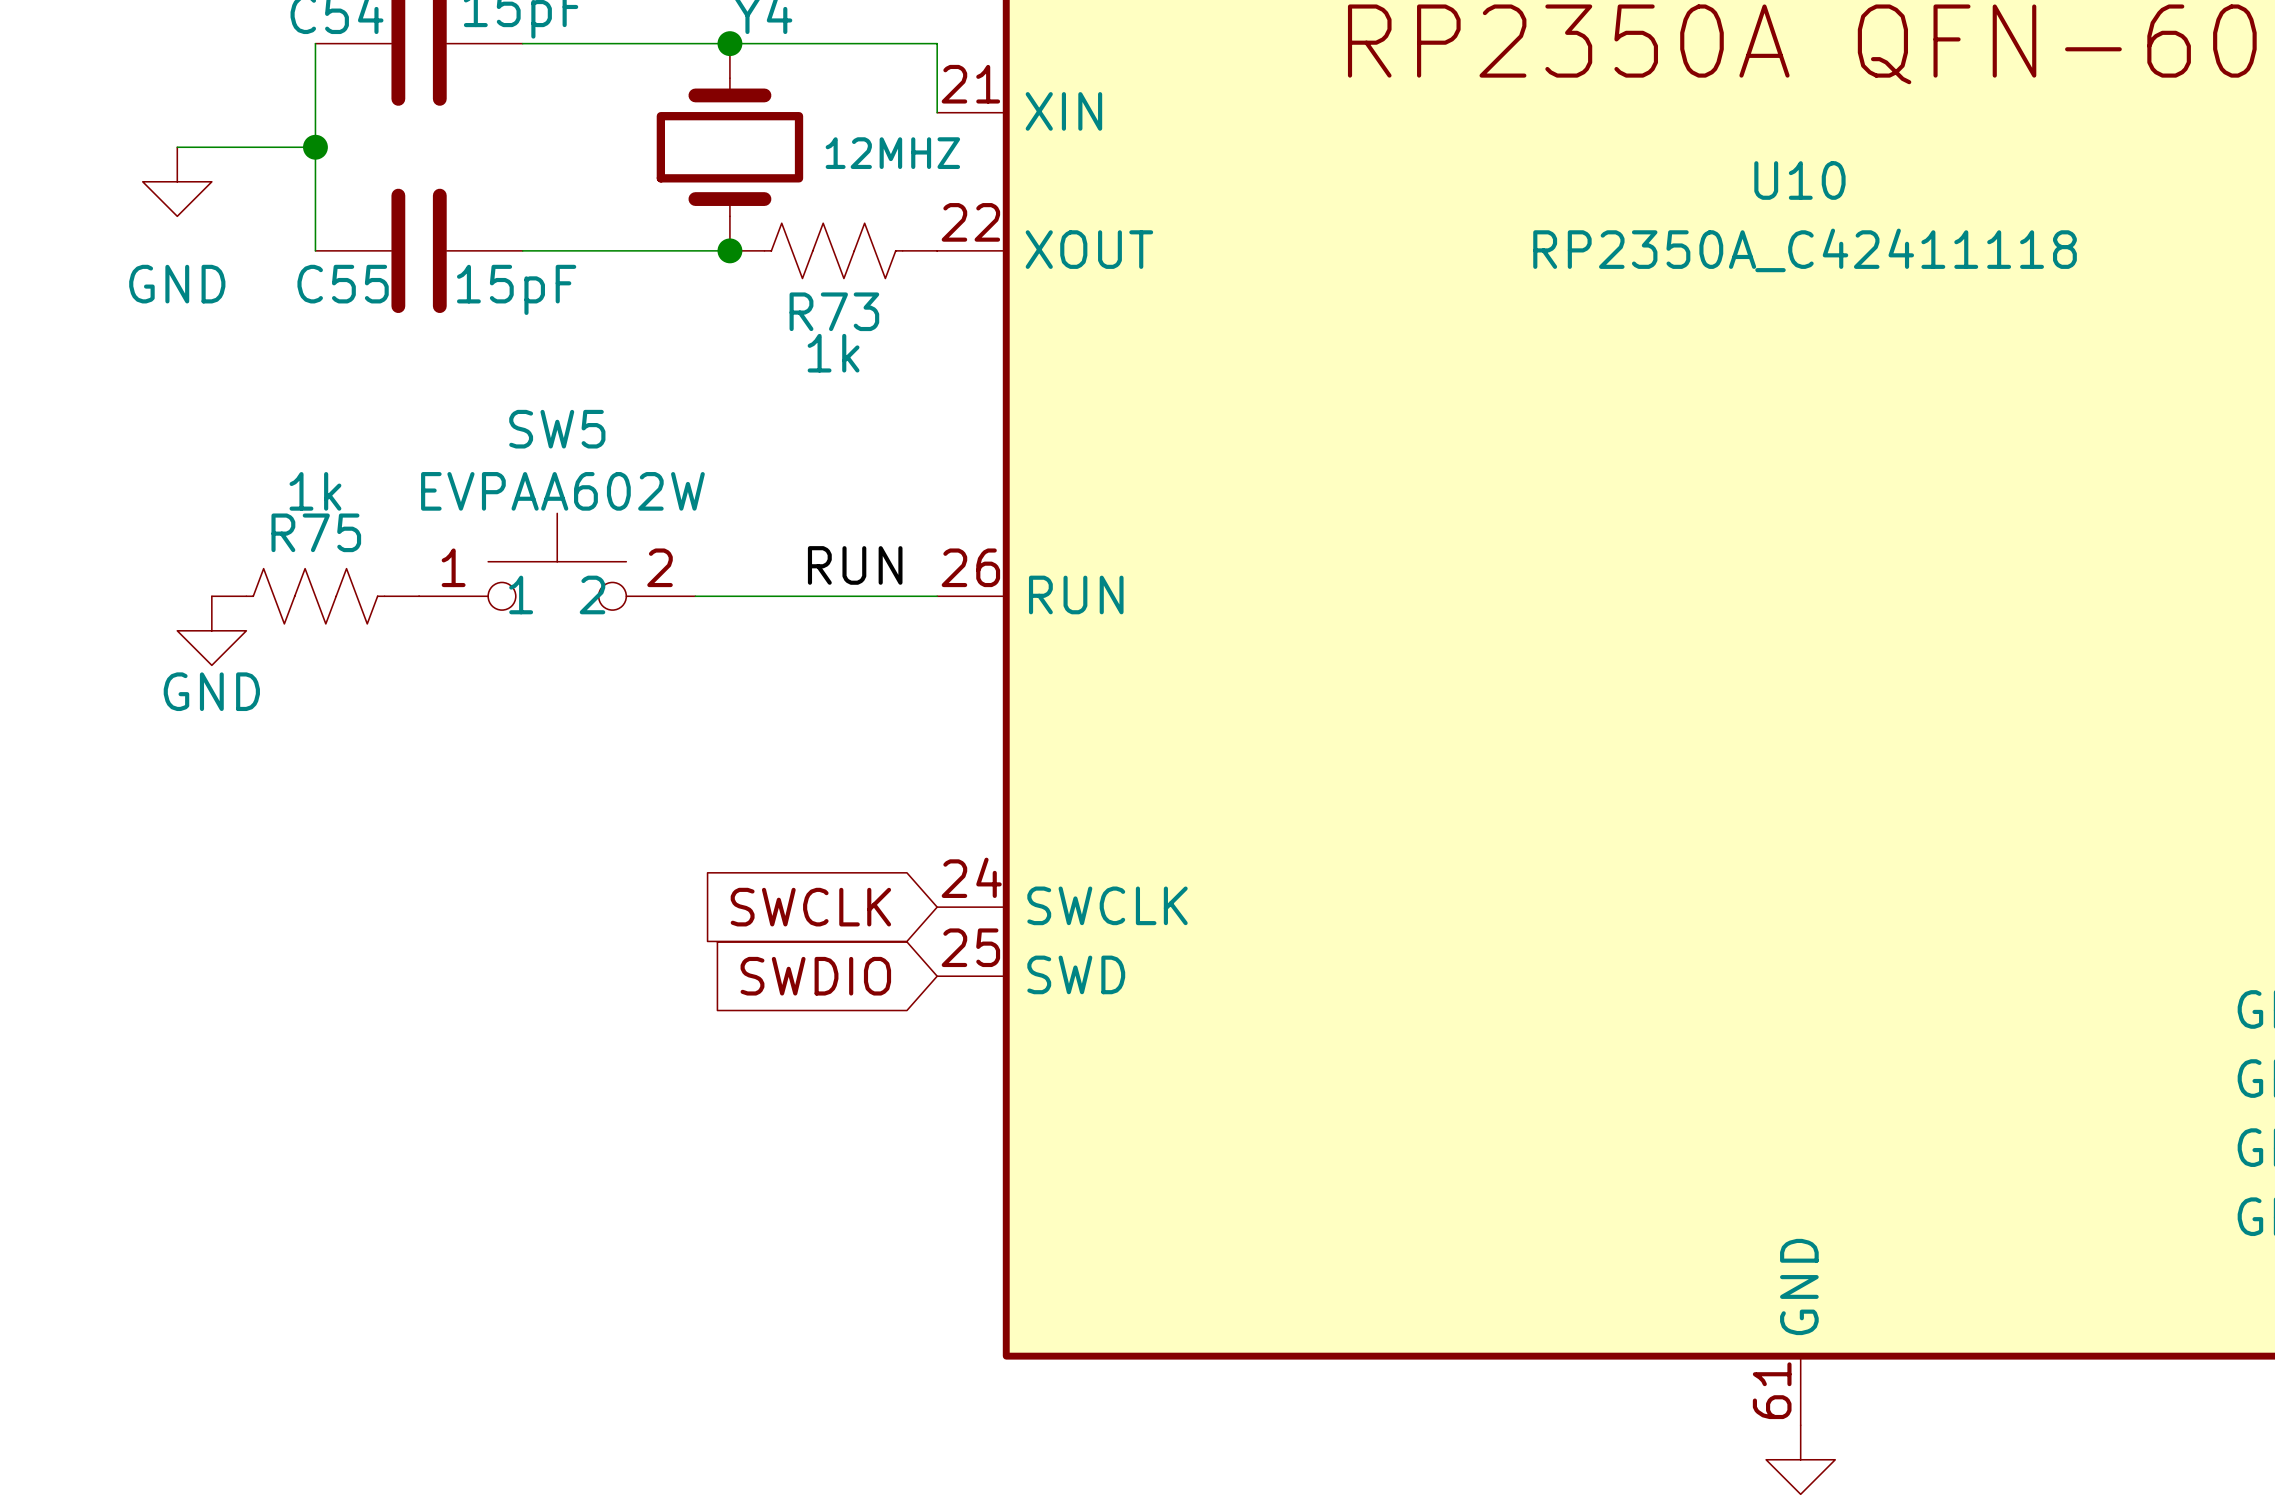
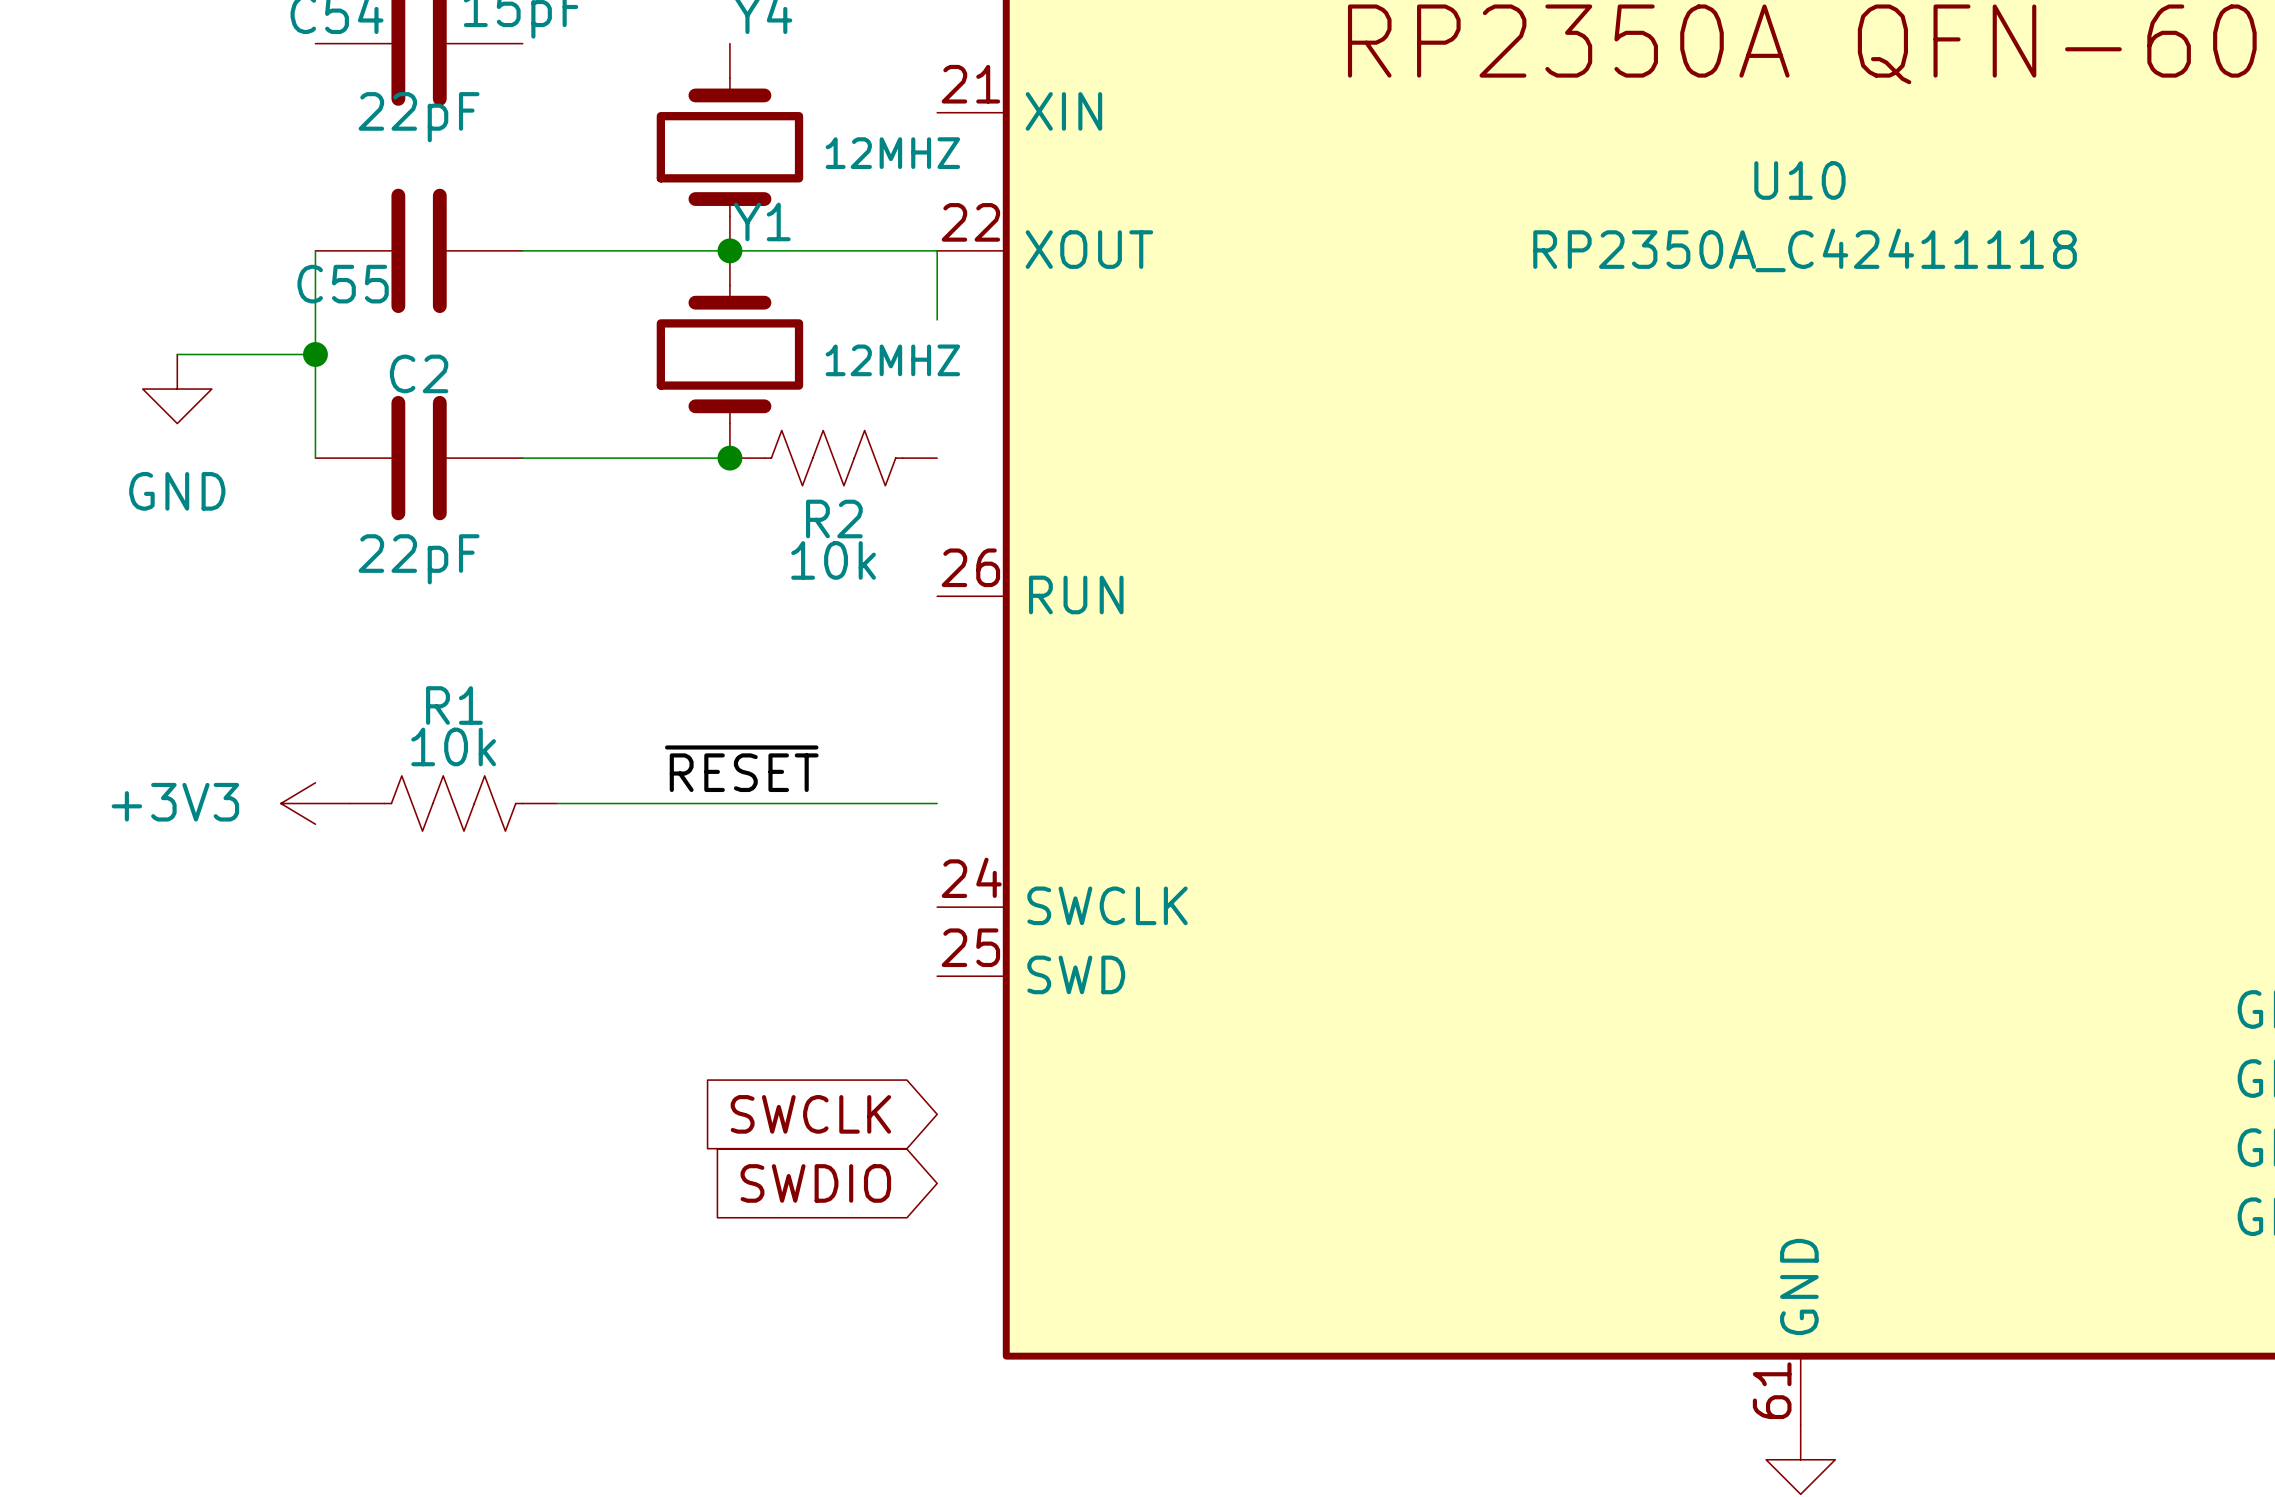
wire: (315, 43) (315, 250) -> (315, 458) (315, 250)
wire: (522, 43) (937, 43) (937, 112) -> none
junction: (729, 43) -> none
wire: (177, 147) (315, 147) -> (177, 354) (315, 354)
junction: (315, 147) -> none
power symbol: GND (177, 181) -> none
wire: none -> (729, 250) (937, 250) (937, 319)
R73: 1k (833, 250) -> none
C55 value: 15pF (516, 289) -> 22pF (419, 117)
junction: none -> (315, 354)
Y1: none -> 12MHZ (729, 354)
power symbol: none -> GND (177, 389)
C2: none -> 22pF (419, 458)
wire: none -> (522, 458) (729, 458)
junction: none -> (729, 458)
R2: none -> 10k (833, 458)
SW5: EVPAA602W (557, 561) -> none
label: RUN (855, 565) -> none
R75: 1k (315, 596) -> none
wire: (695, 596) (937, 596) -> none
power symbol: GND (211, 630) -> none
label: none -> ~{RESET} (741, 768)
power symbol: none -> +3V3 (315, 803)
R1: none -> 10k (453, 803)
wire: none -> (557, 803) (937, 803)
global label position: SWCLK (810, 907) -> SWCLK (810, 1114)
global label position: SWDIO (815, 976) -> SWDIO (815, 1183)

